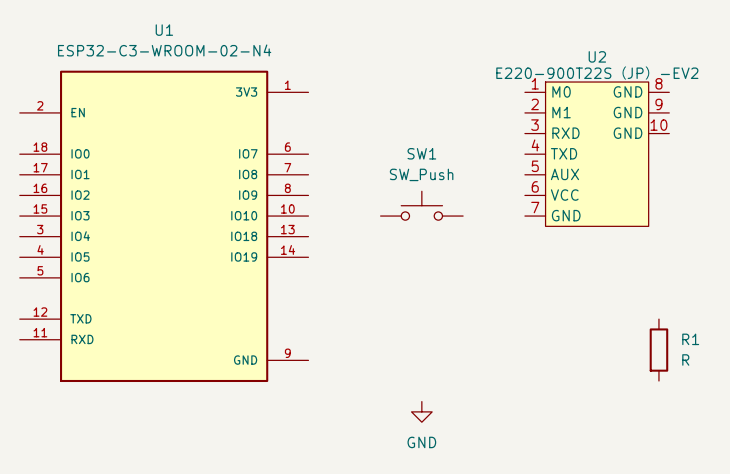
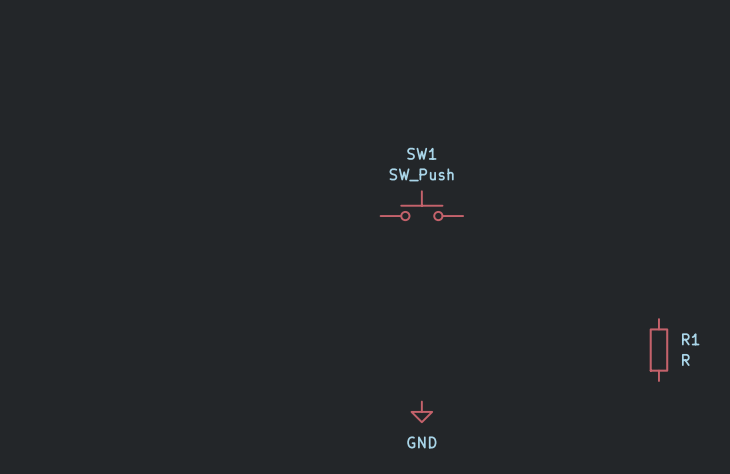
U2: E220-900T22S（JP）-EV2 (597, 154) -> none
U1: ESP32-C3-WROOM-02-N4 (164, 226) -> none

